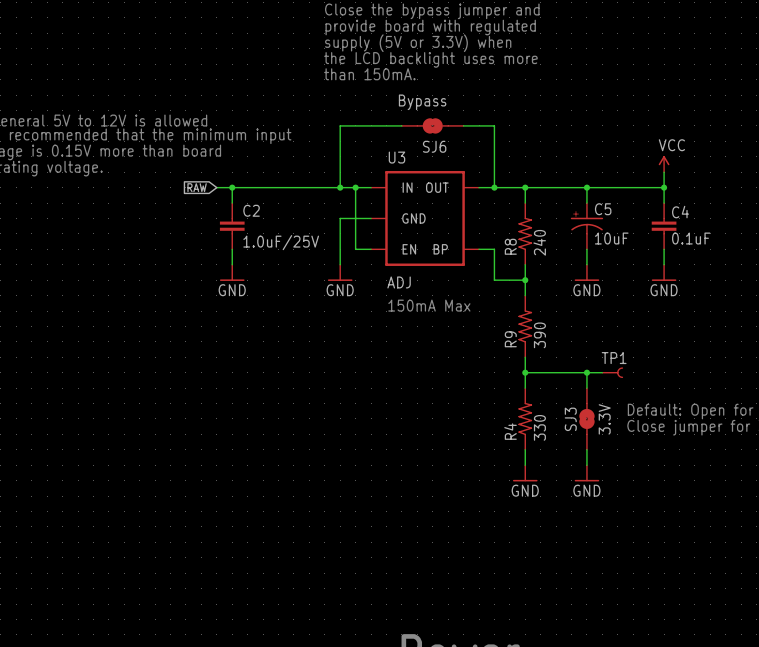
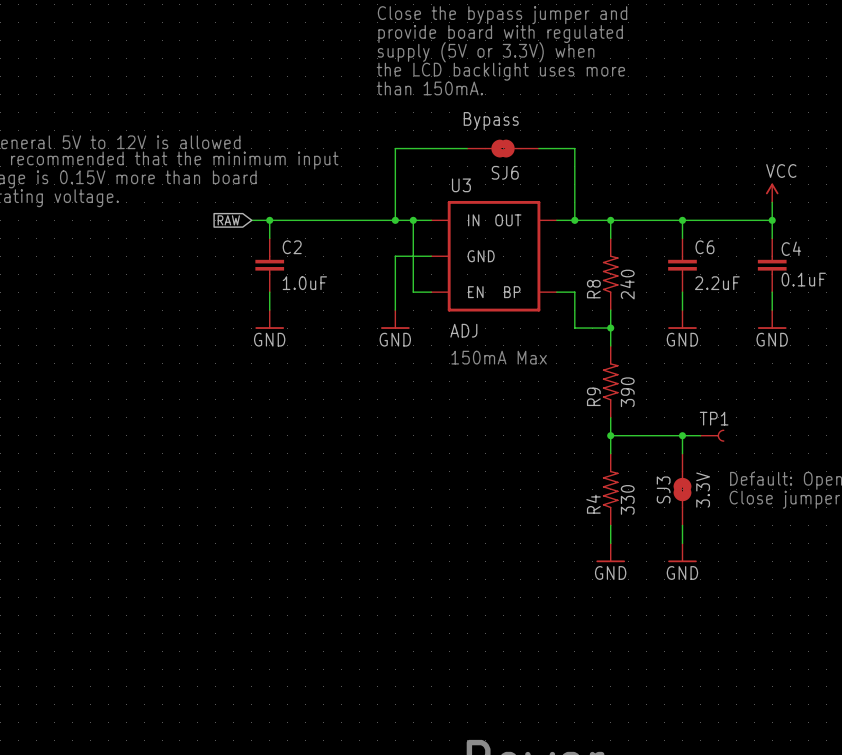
C5: 10uF (586, 226) -> none
C6: none -> 2.2uF (682, 265)
C2 value: 1.0uF/25V (281, 242) -> 1.0uF (304, 283)

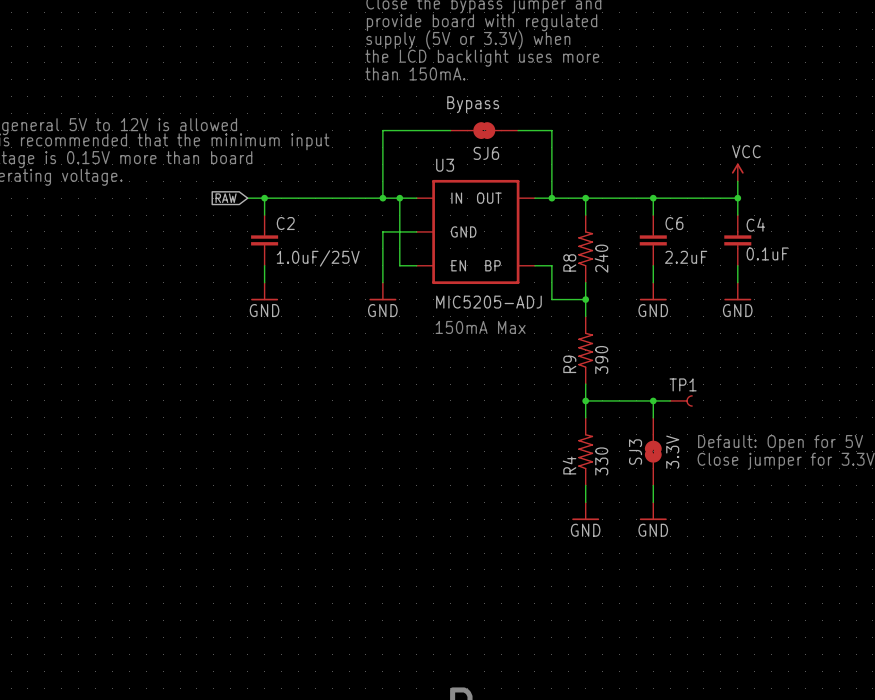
C2 value: 1.0uF (304, 283) -> 1.0uF/25V (318, 258)
U3 value: ADJ (463, 330) -> MIC5205-ADJ (488, 302)

